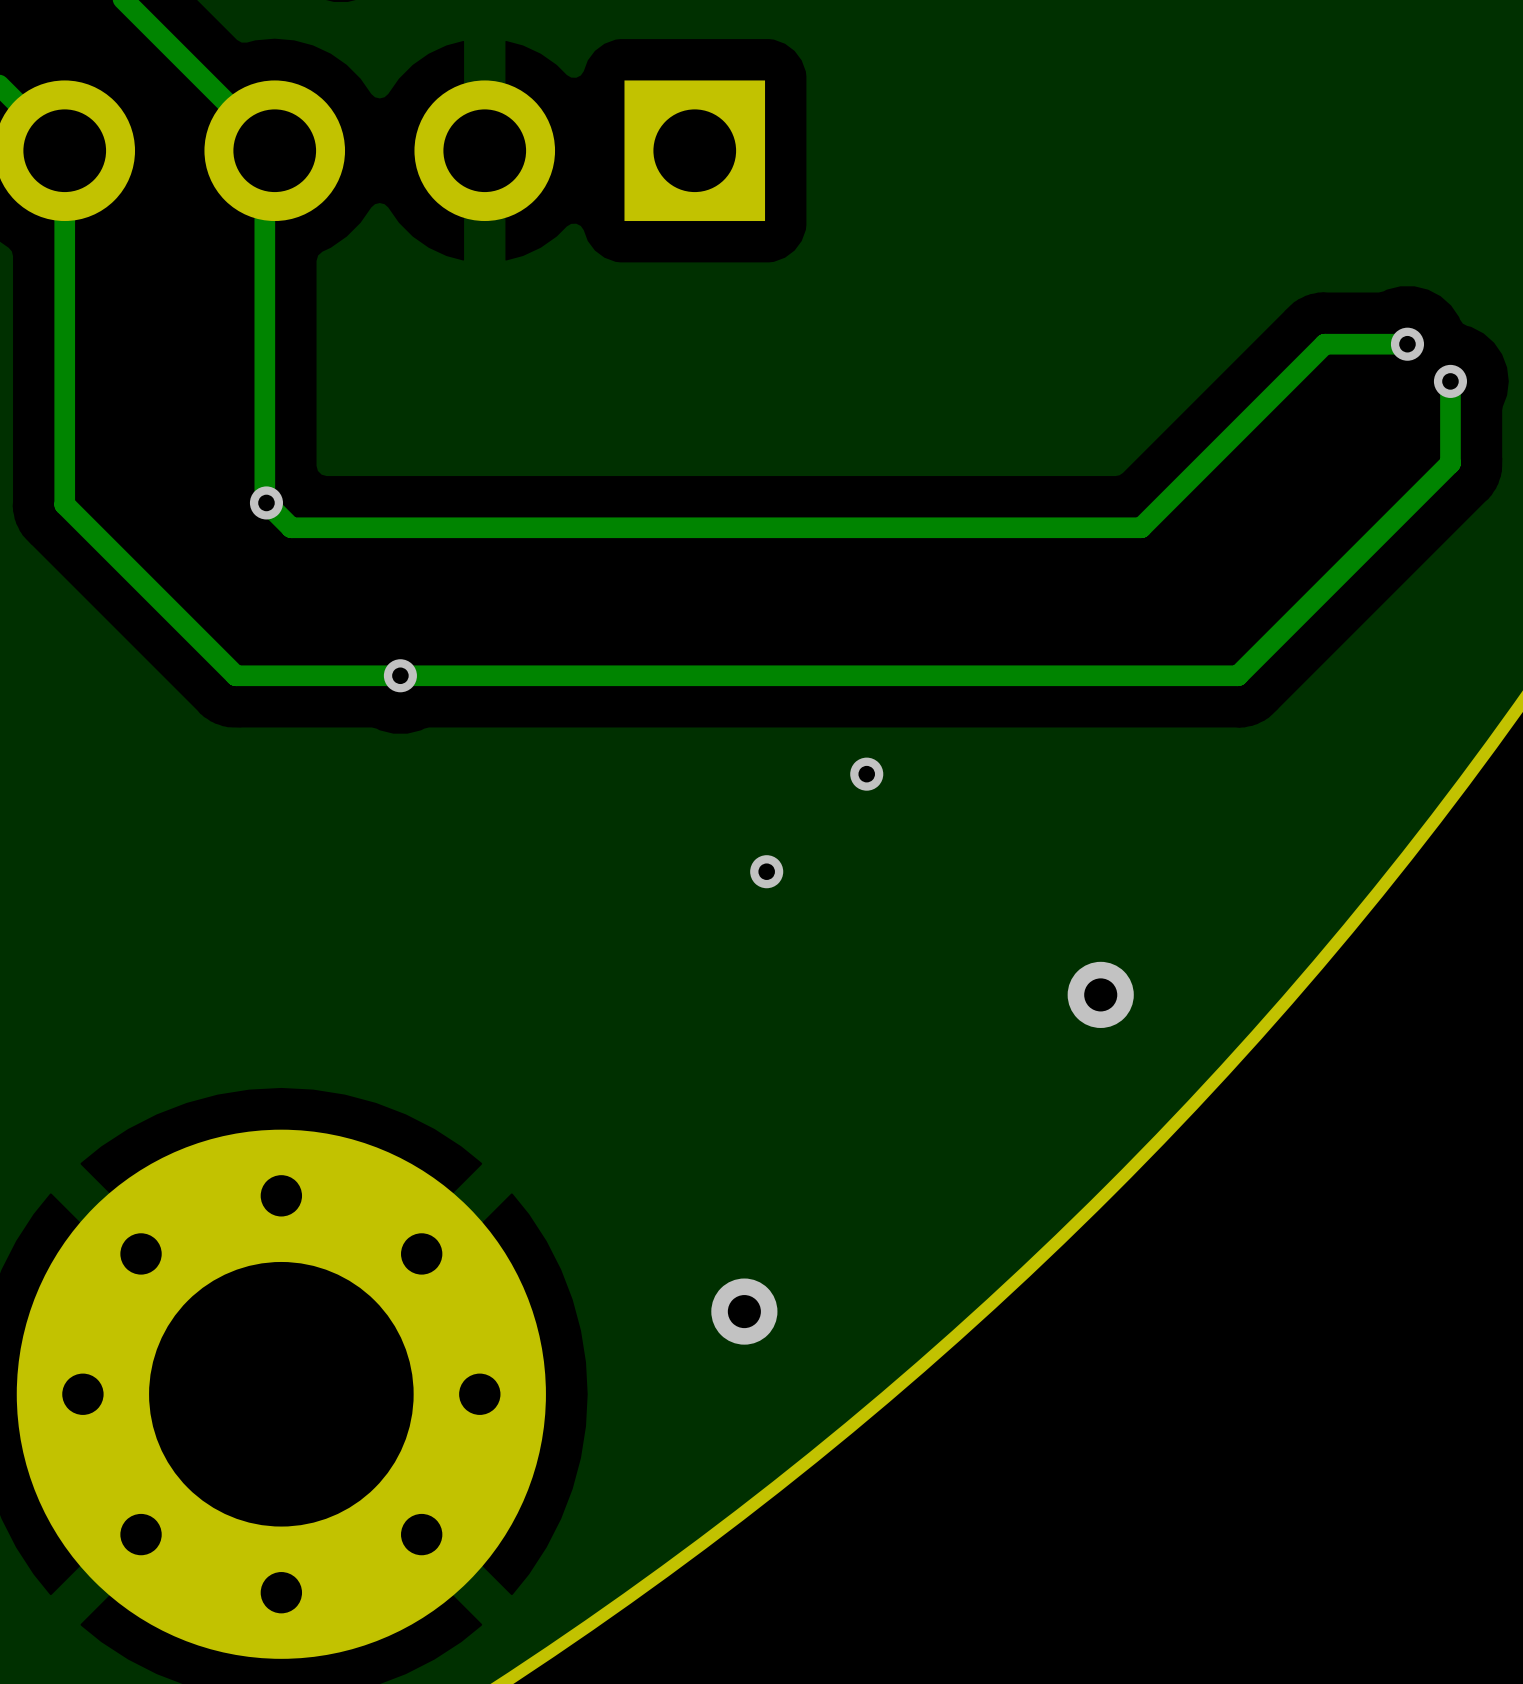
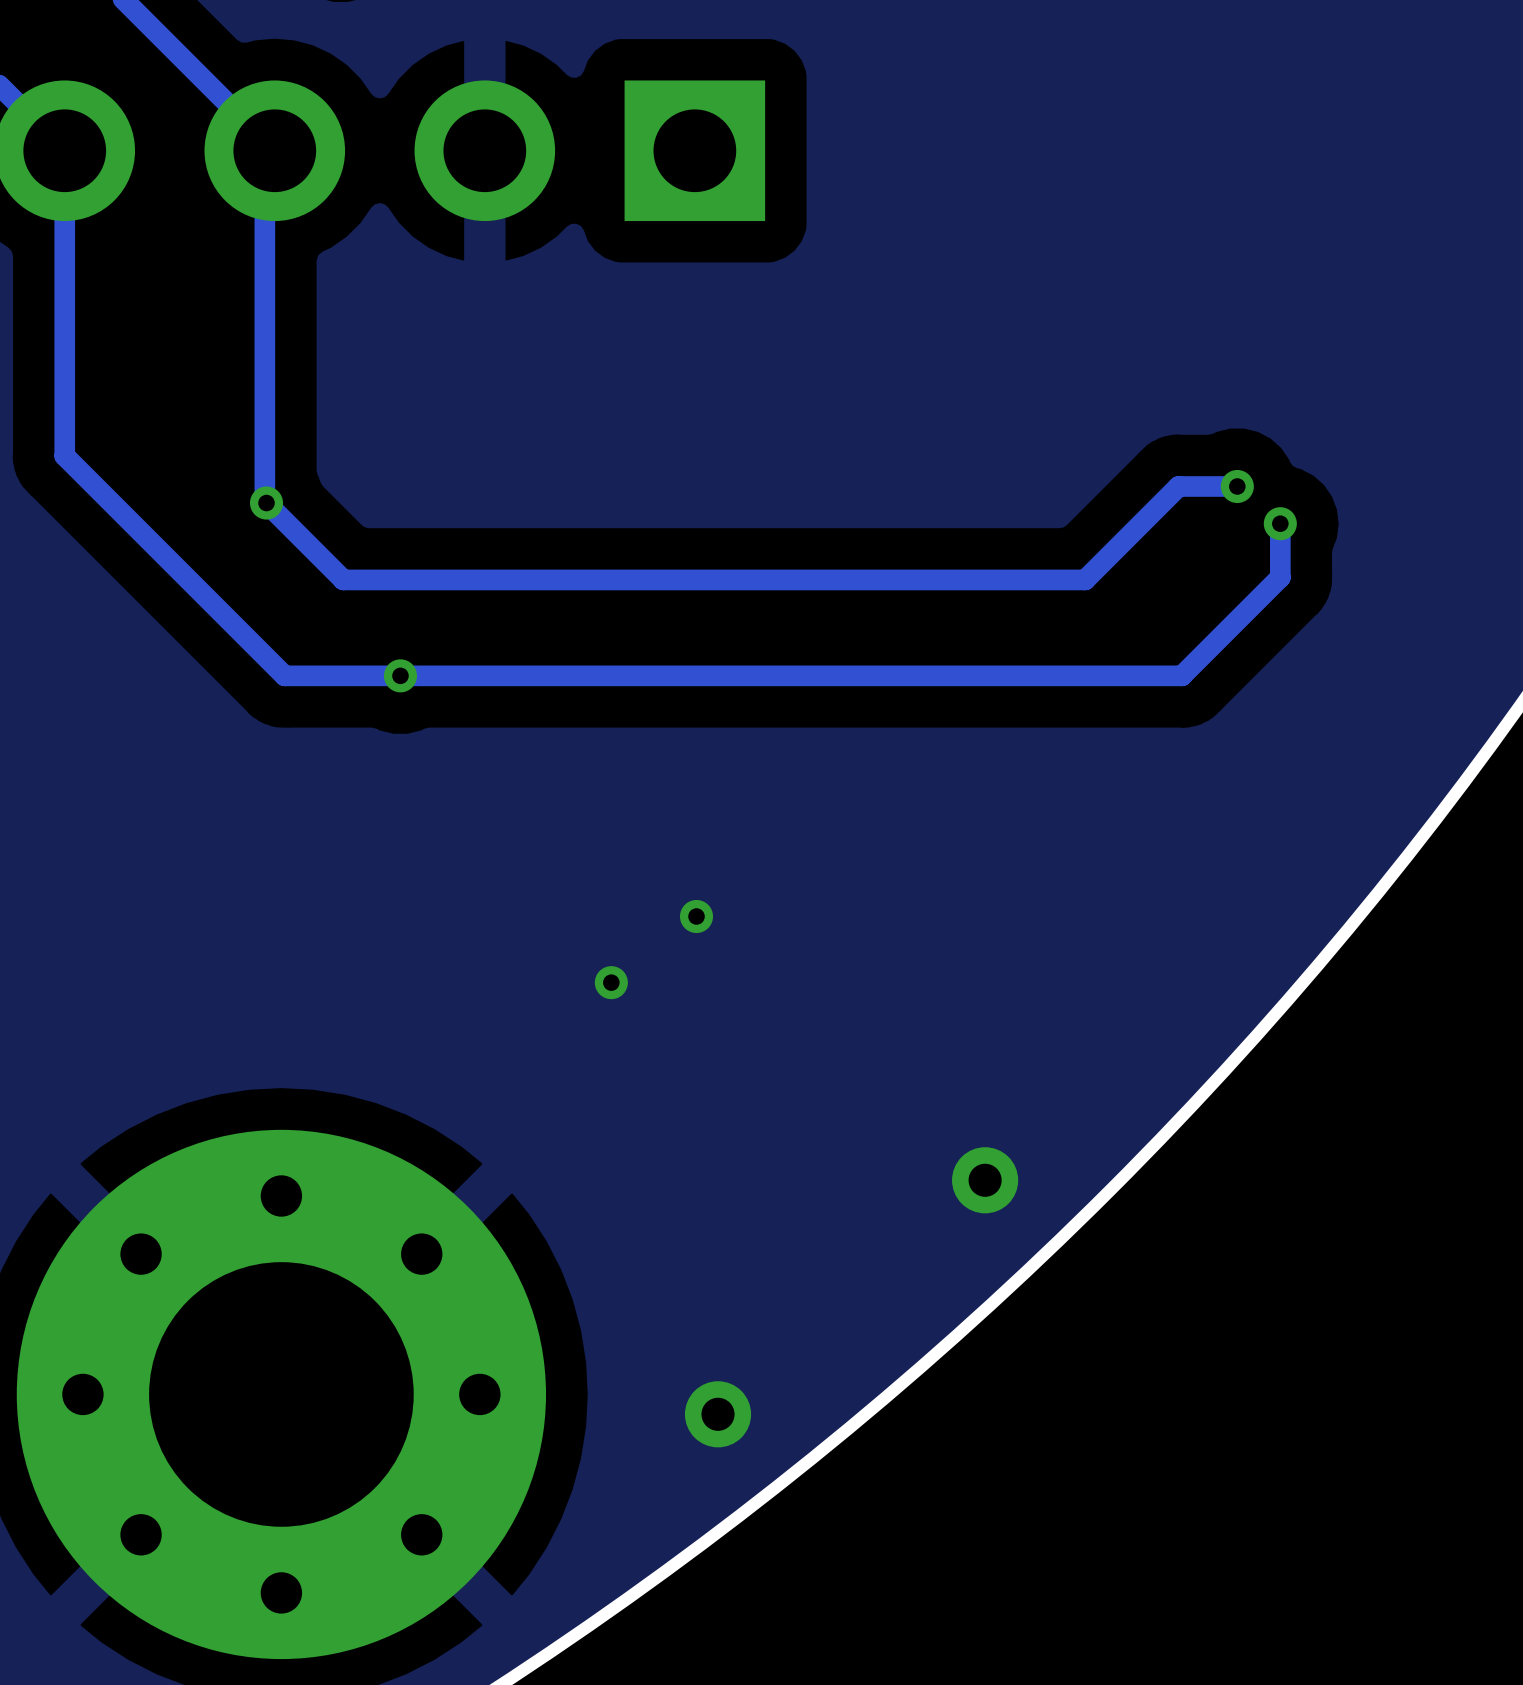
track: (1407, 344) (1324, 344) (1141, 527) (291, 527) -> (1237, 486) (1178, 486) (1085, 579) (343, 579) (291, 527)
via: (1407, 344) -> none
track: (1450, 381) (1450, 463) (1237, 675) (1181, 675) -> (1280, 523) (1280, 577) (1181, 675)
via: (1450, 381) -> none
track: (64, 455) (64, 504) (235, 675) (284, 675) -> (64, 455) (284, 675)
via: none -> (1237, 486)
via: none -> (1280, 523)
via: (866, 774) -> none
via position: (766, 871) -> (696, 916)
via: none -> (611, 982)
via: (1100, 994) -> none
via: none -> (985, 1180)
via position: (744, 1311) -> (718, 1414)

